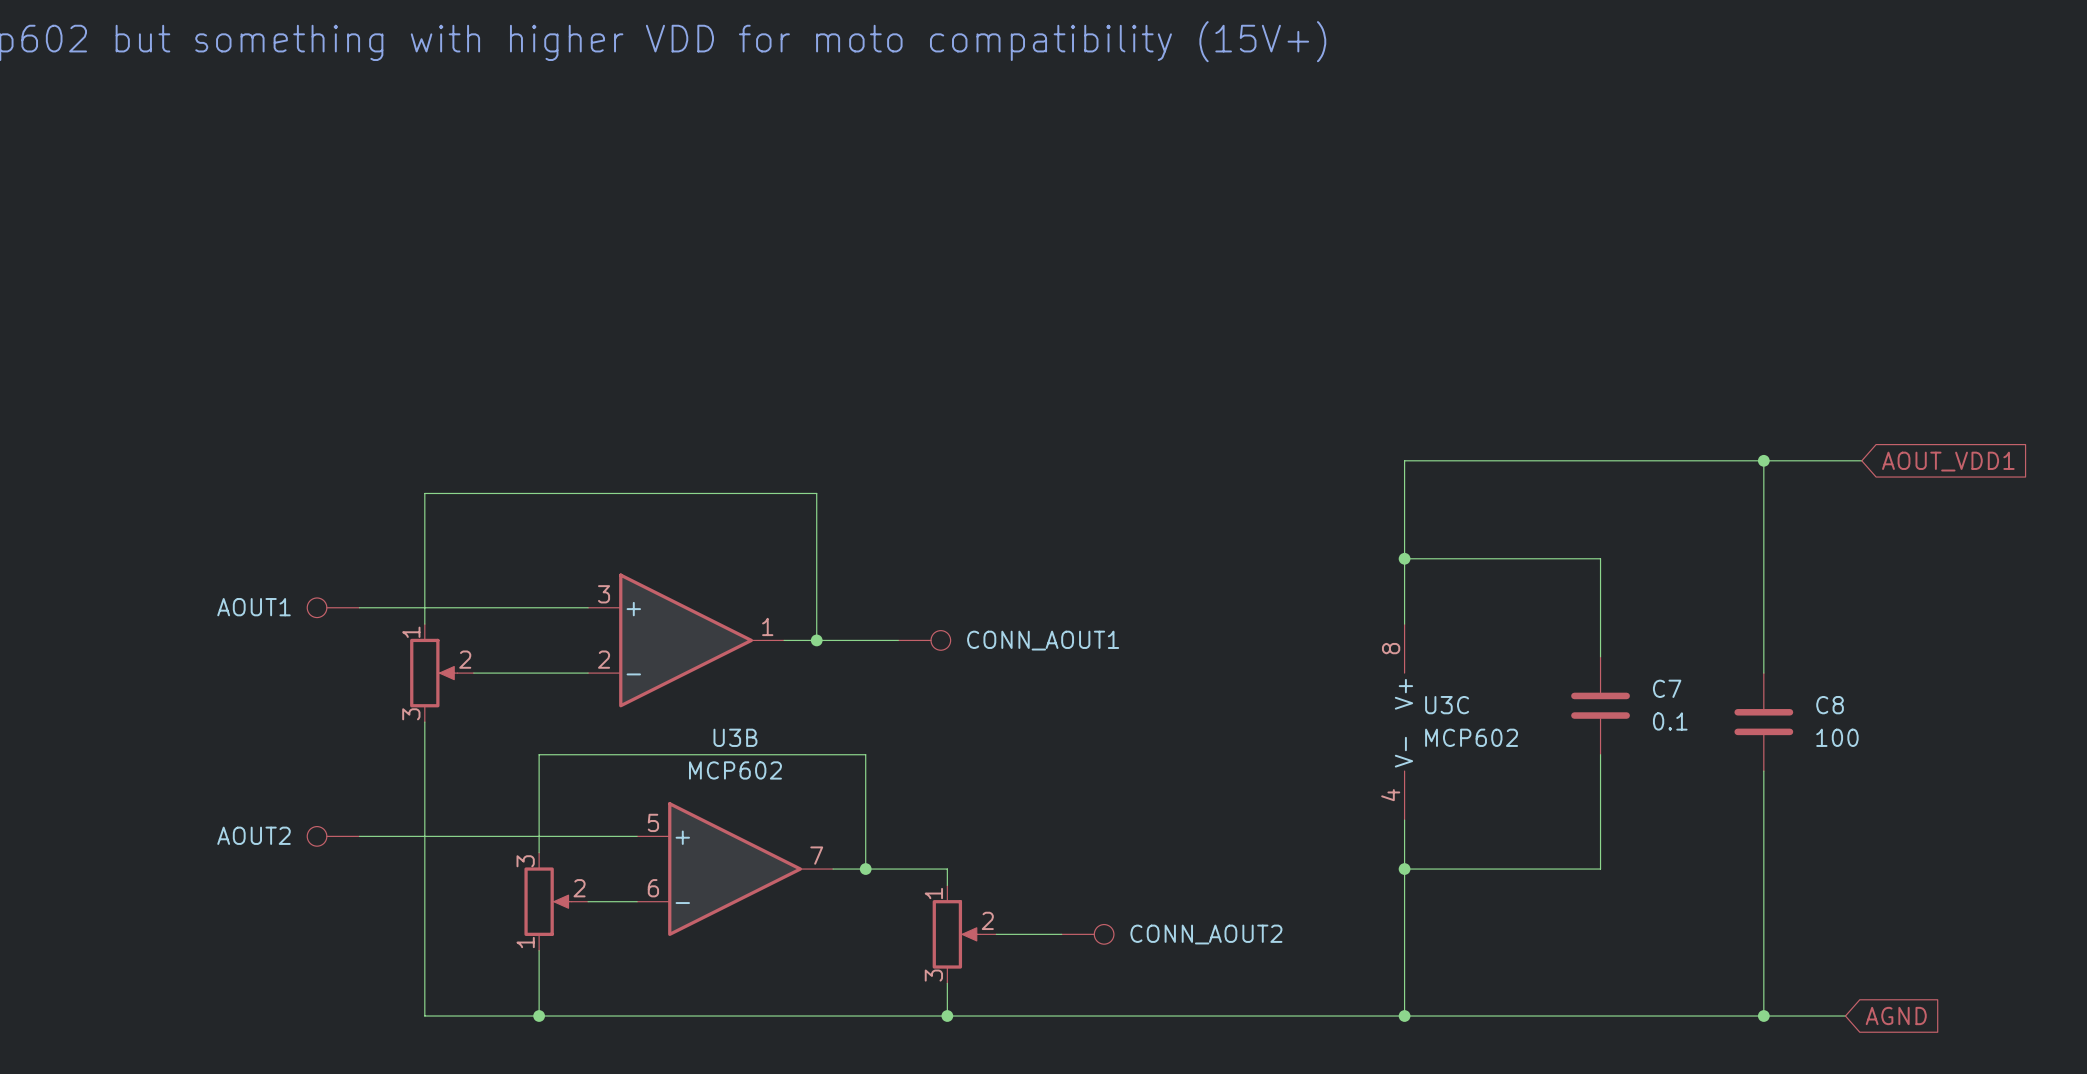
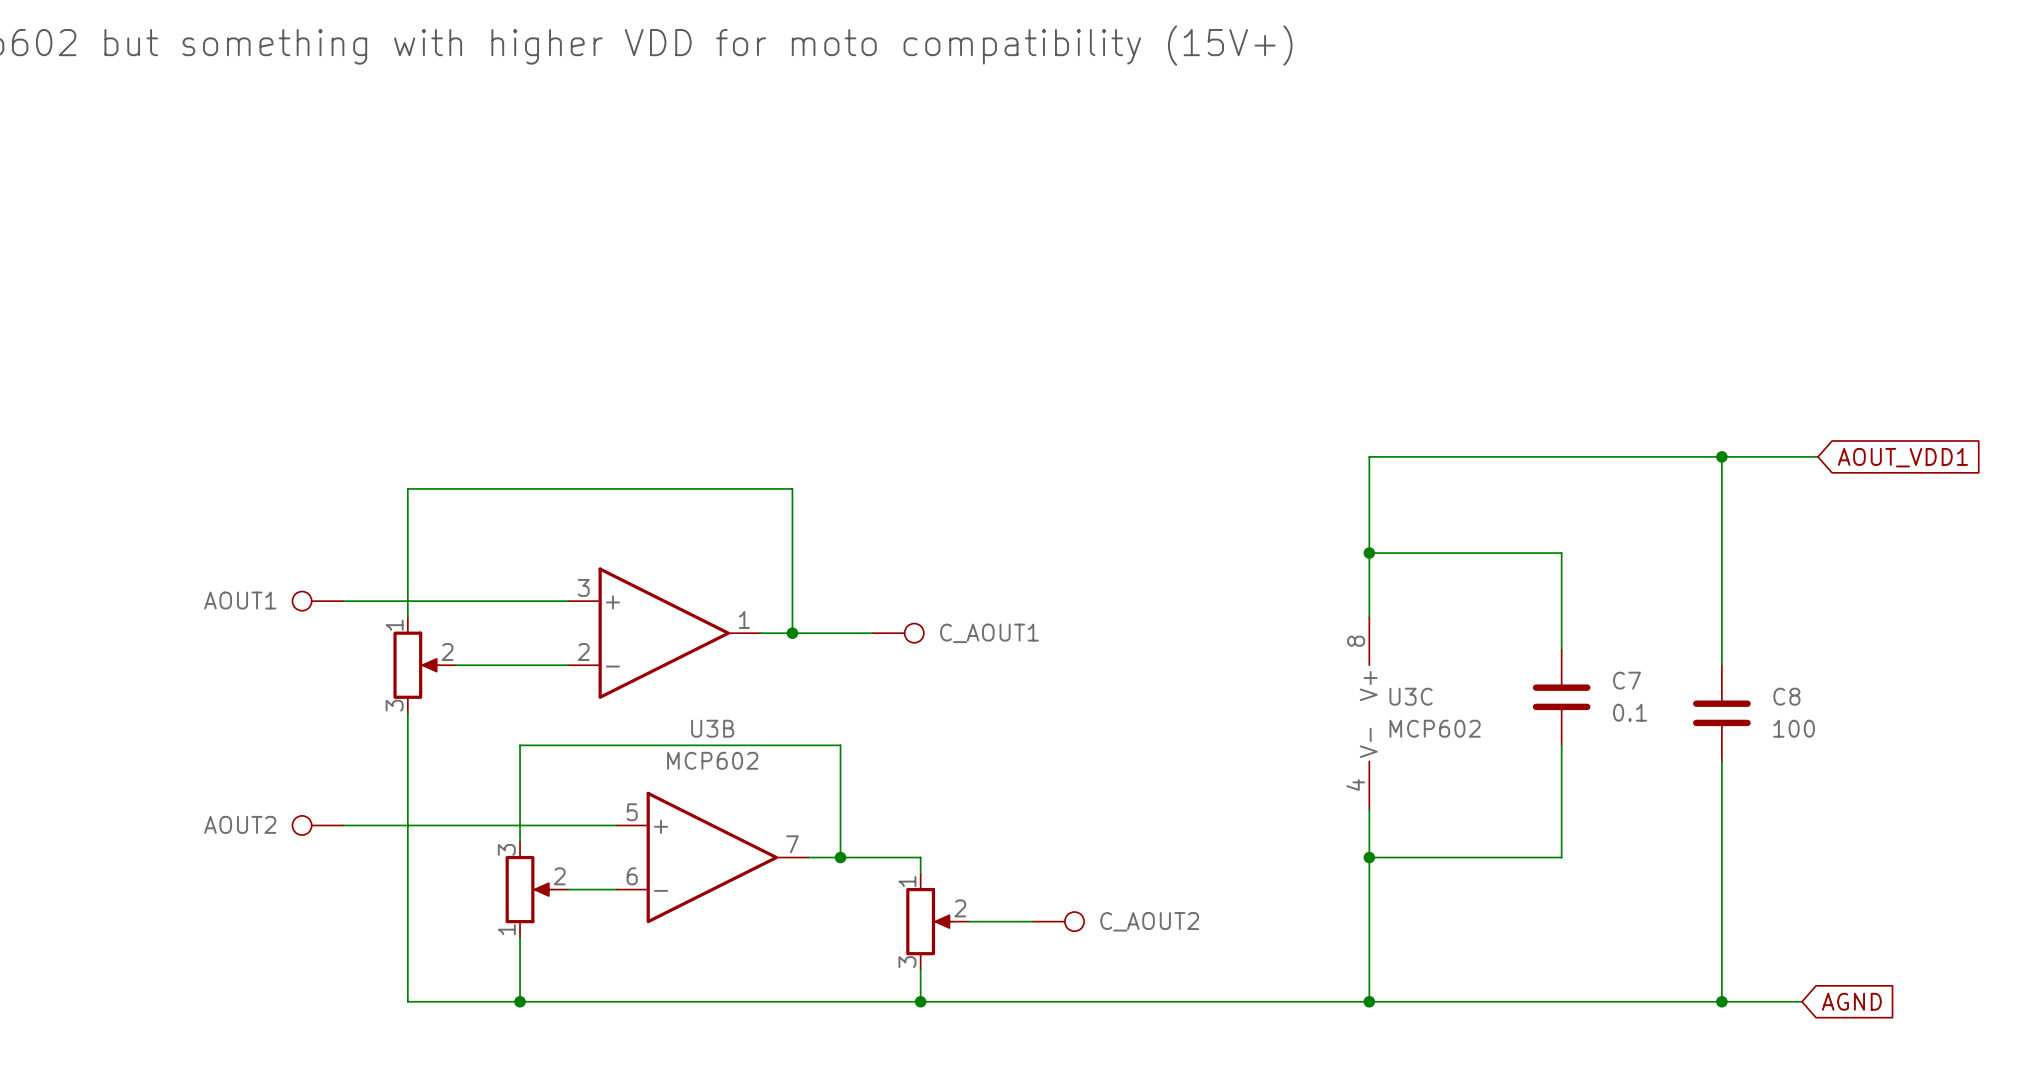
CONN_AOUT1 name: CONN_AOUT1 (1043, 640) -> C_AOUT1 (989, 633)
CONN_AOUT2 name: CONN_AOUT2 (1206, 934) -> C_AOUT2 (1149, 921)

